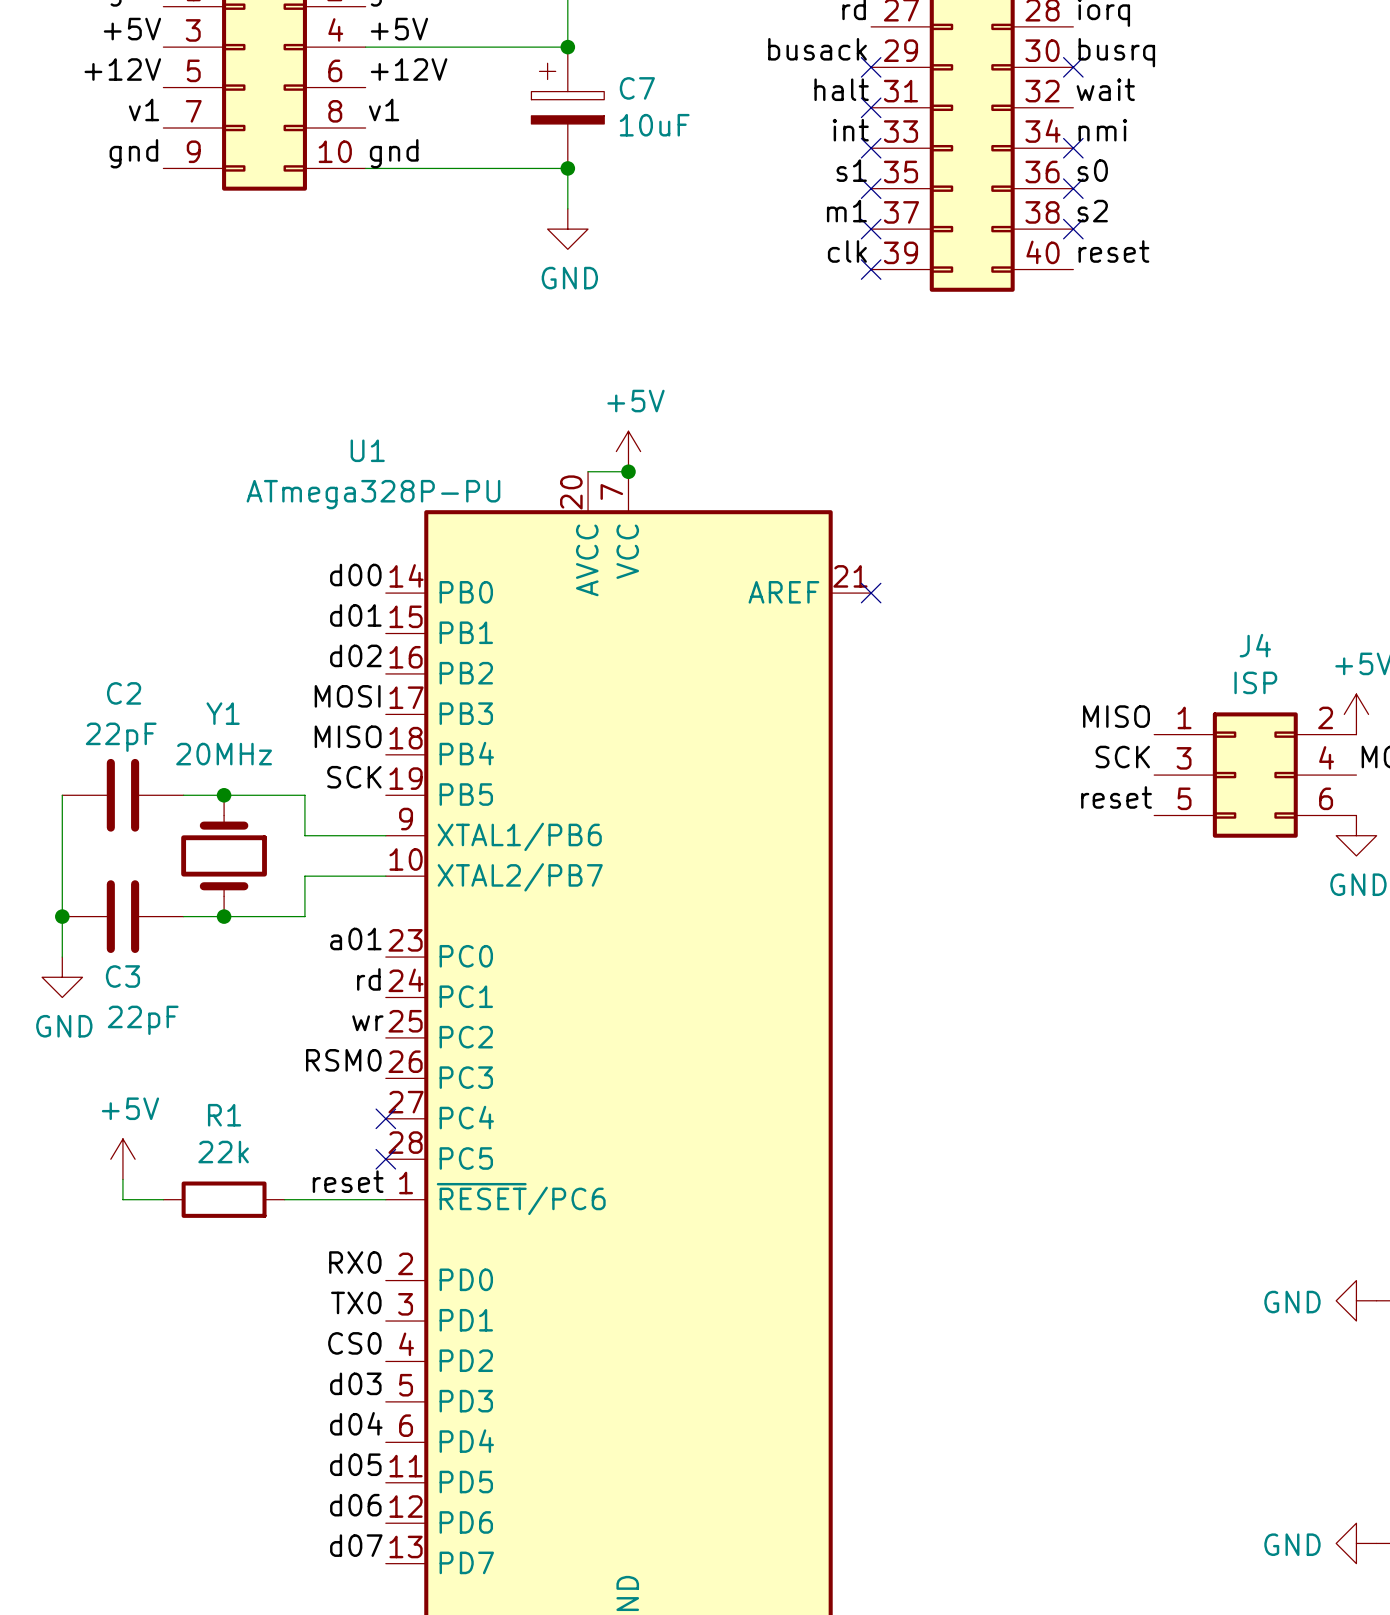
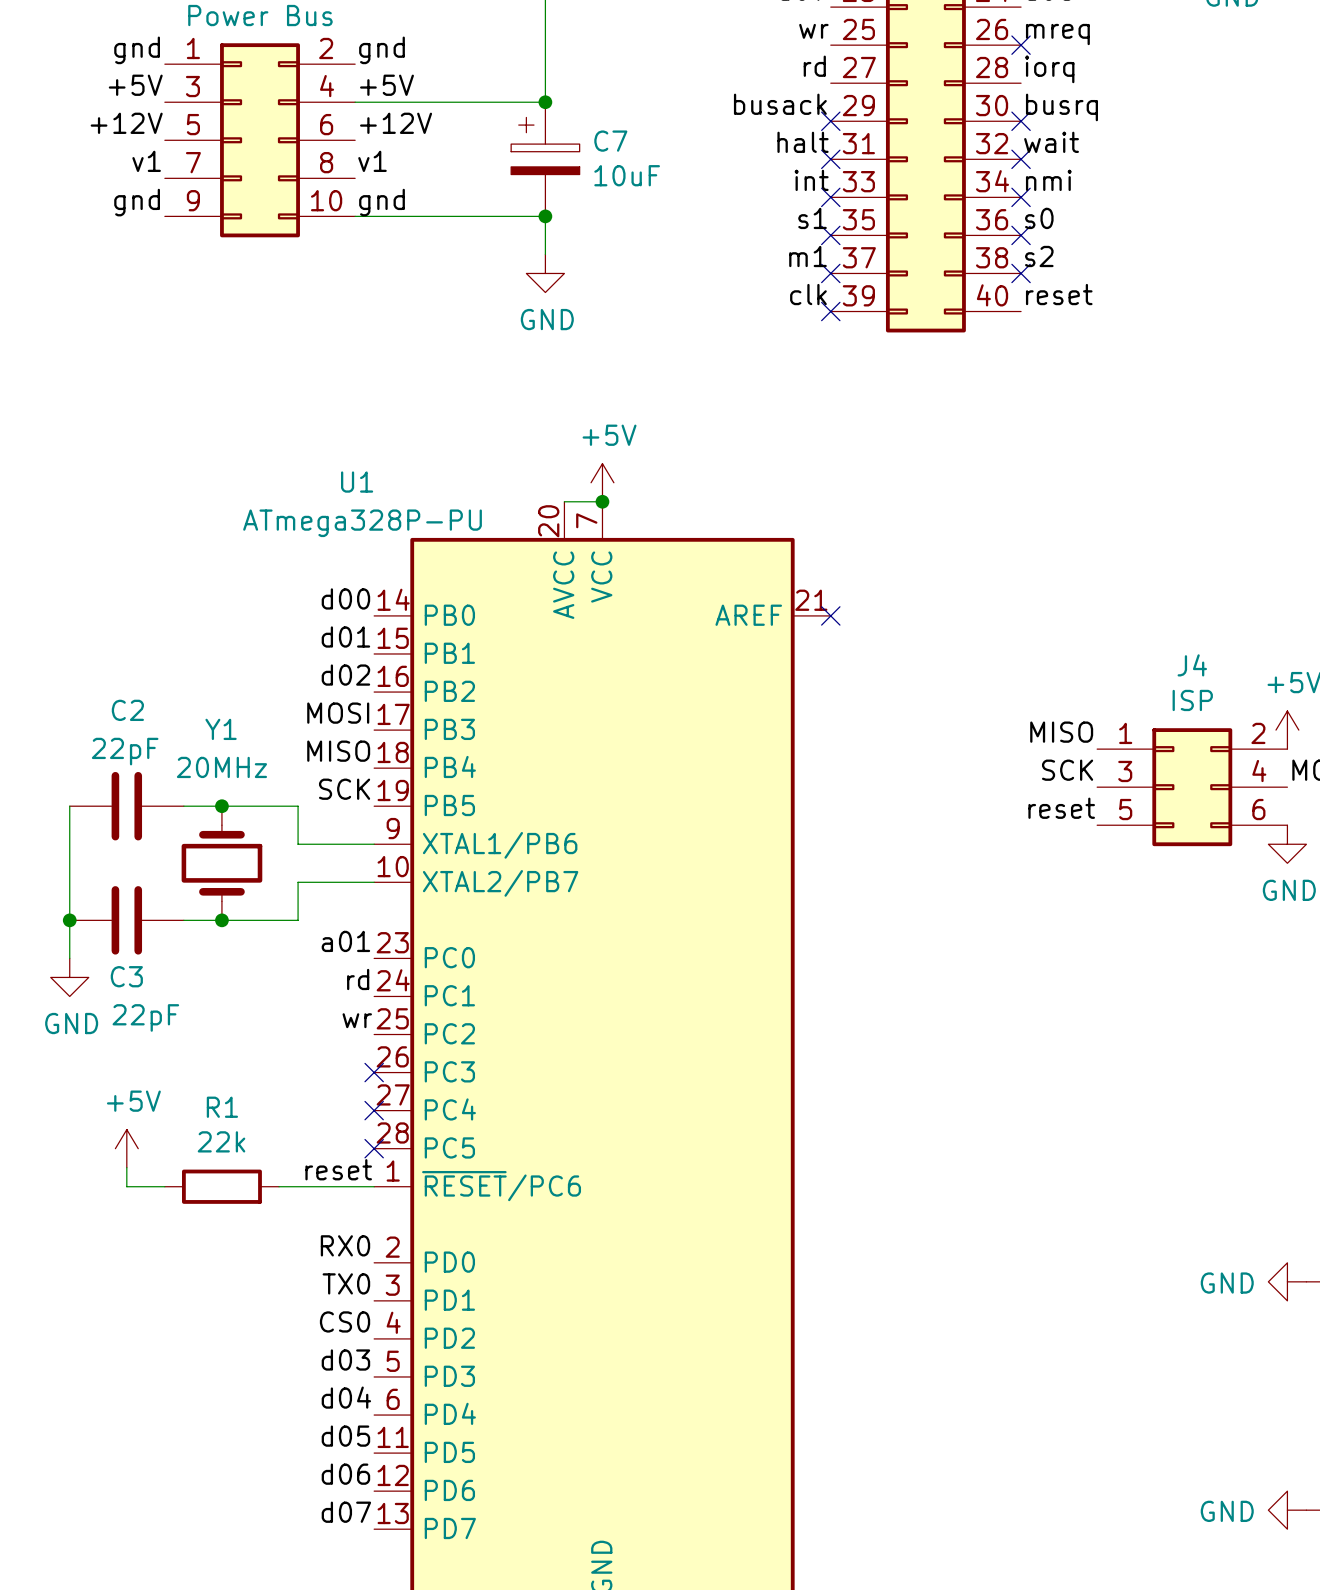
no-connect mark: none -> (1021, 159)
label: RSM0 (343, 1060) -> none
no-connect mark: none -> (374, 1072)

